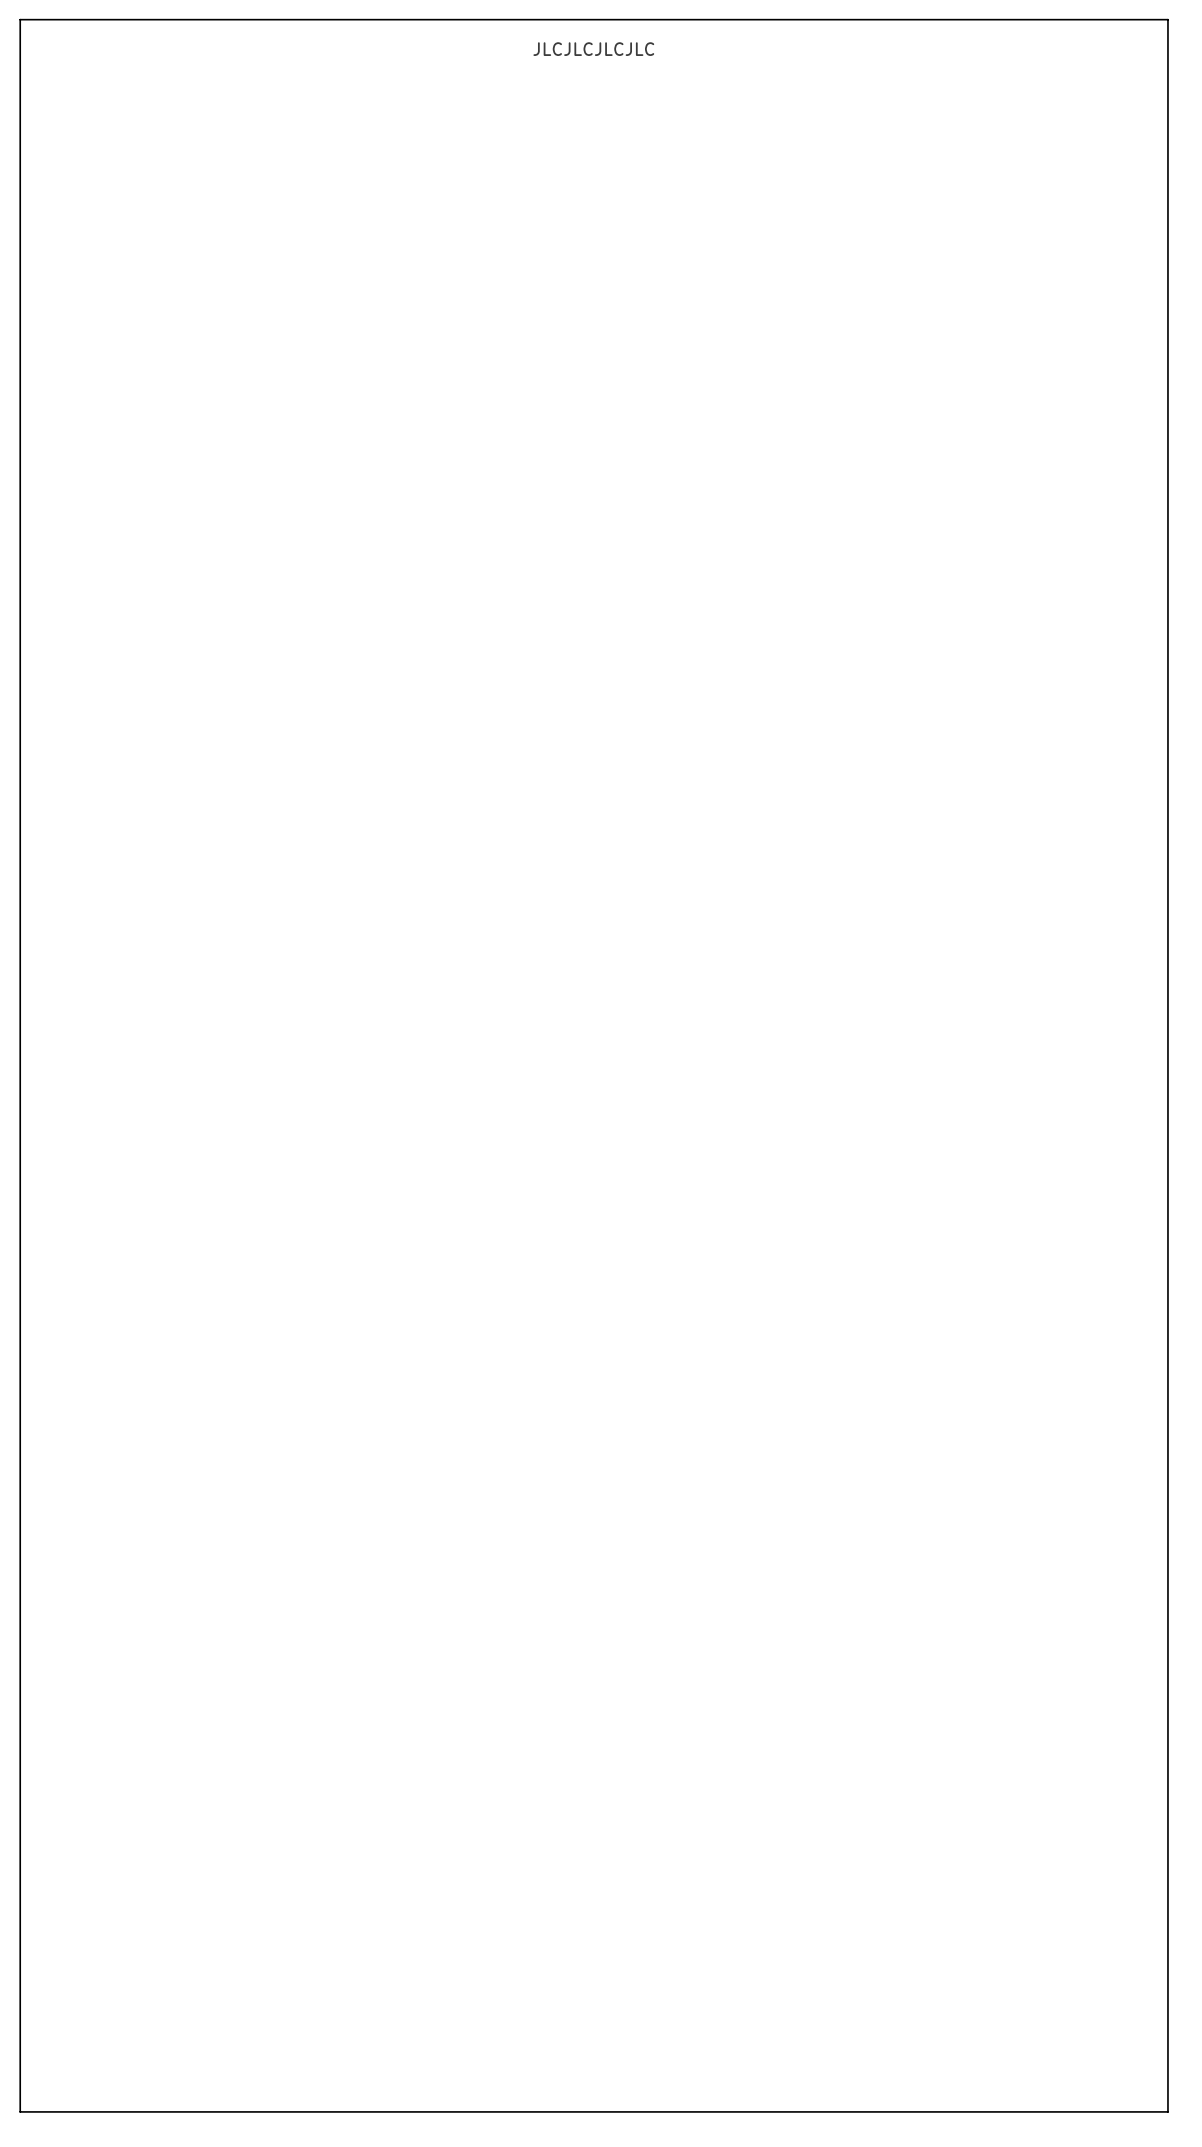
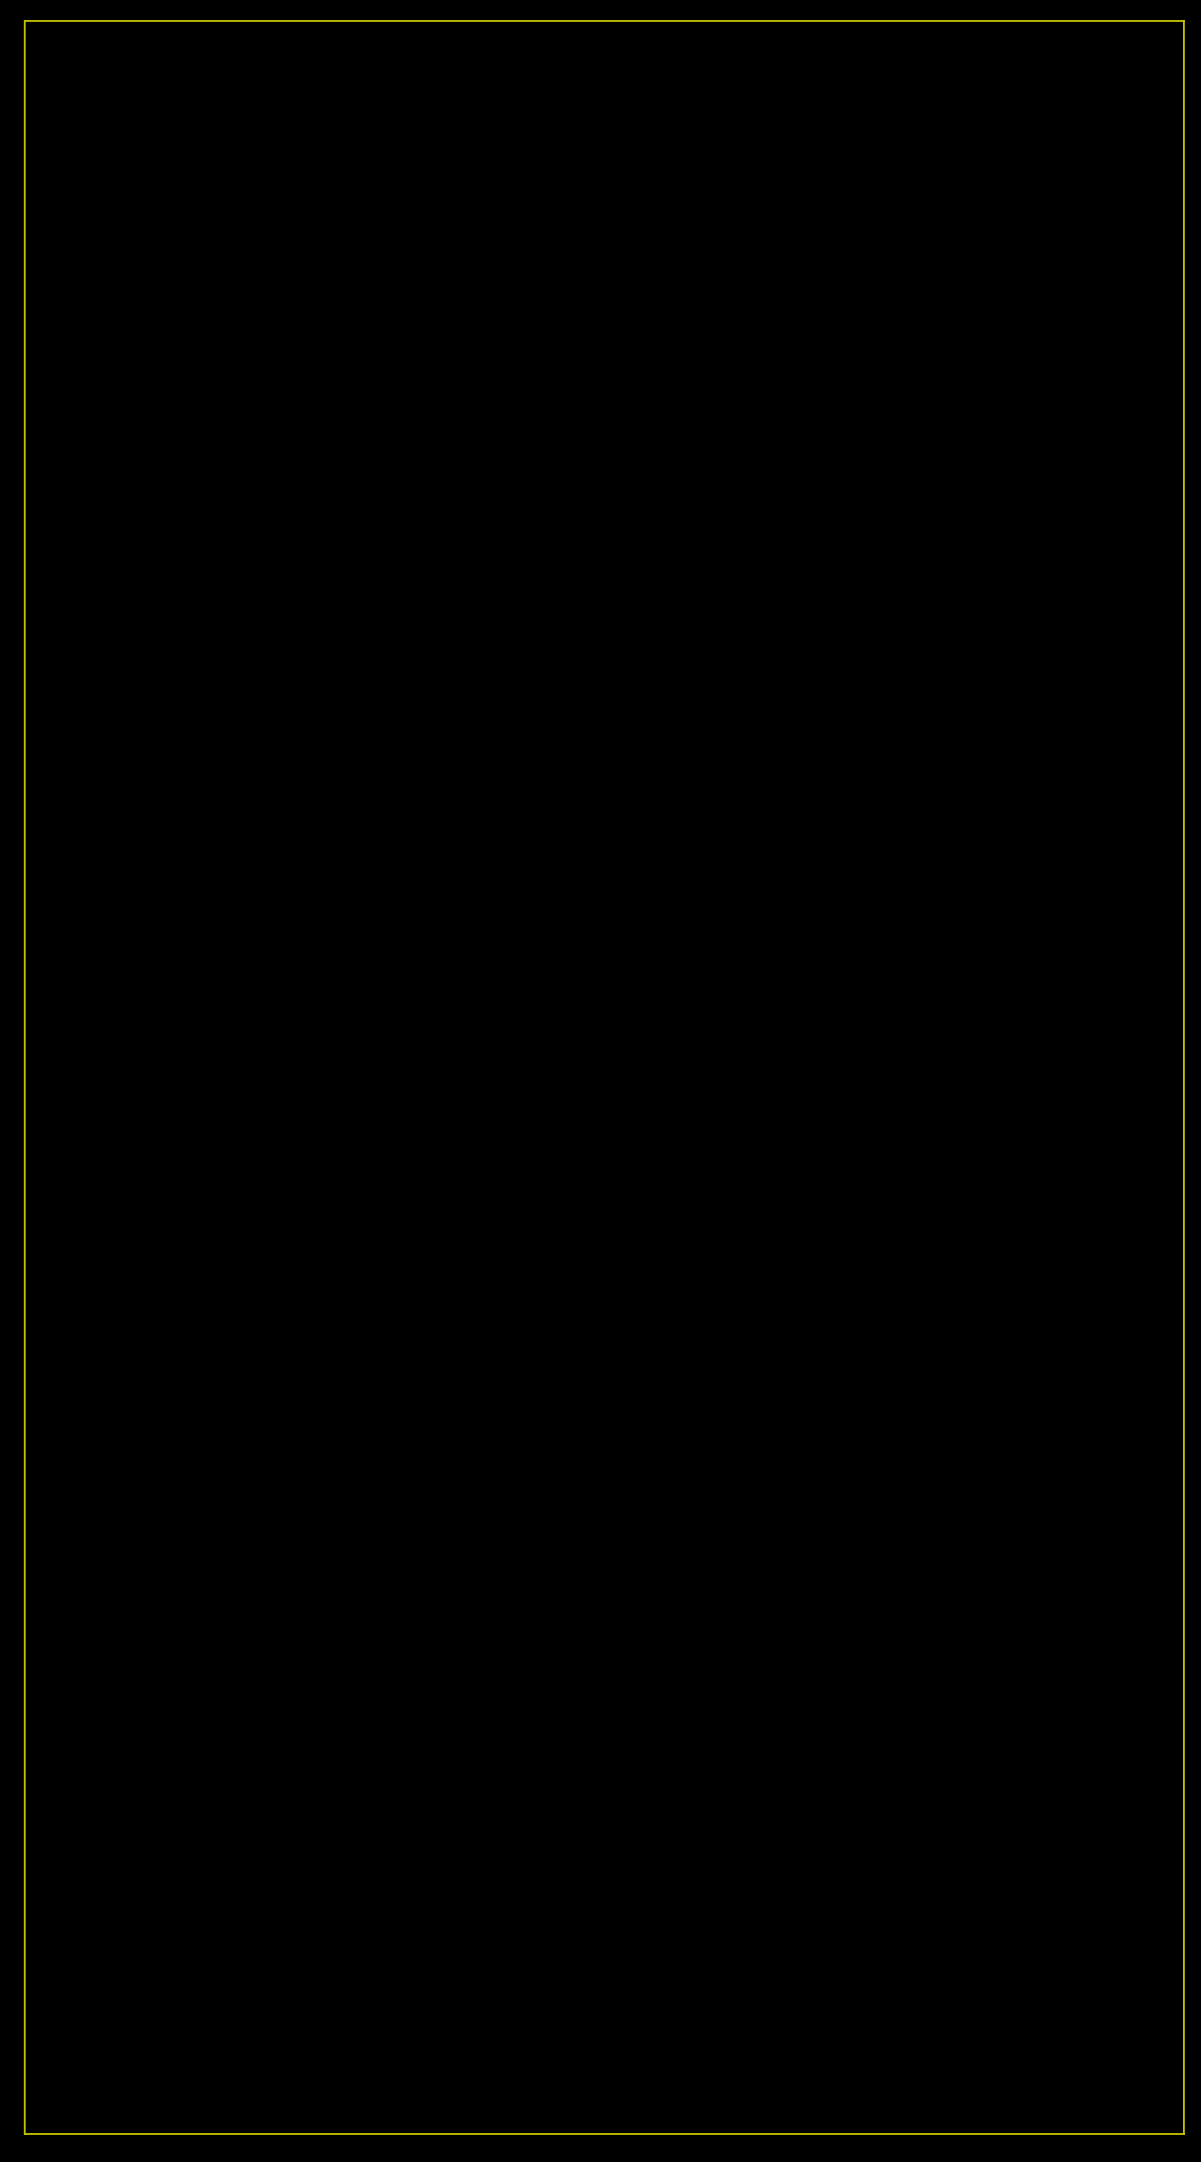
text: JLCJLCJLCJLC (593, 49) -> none

